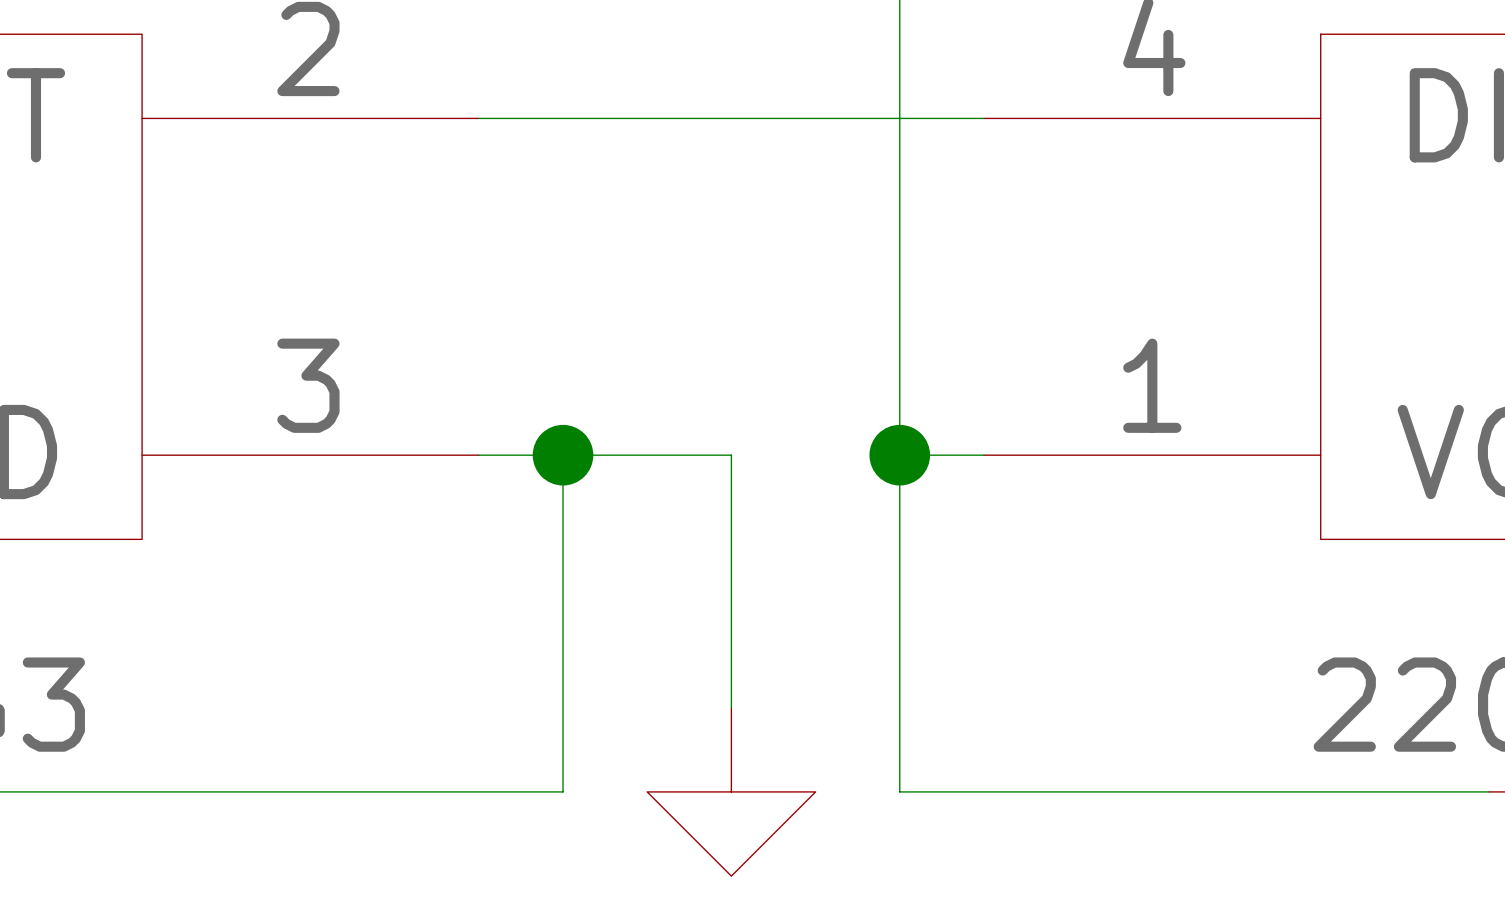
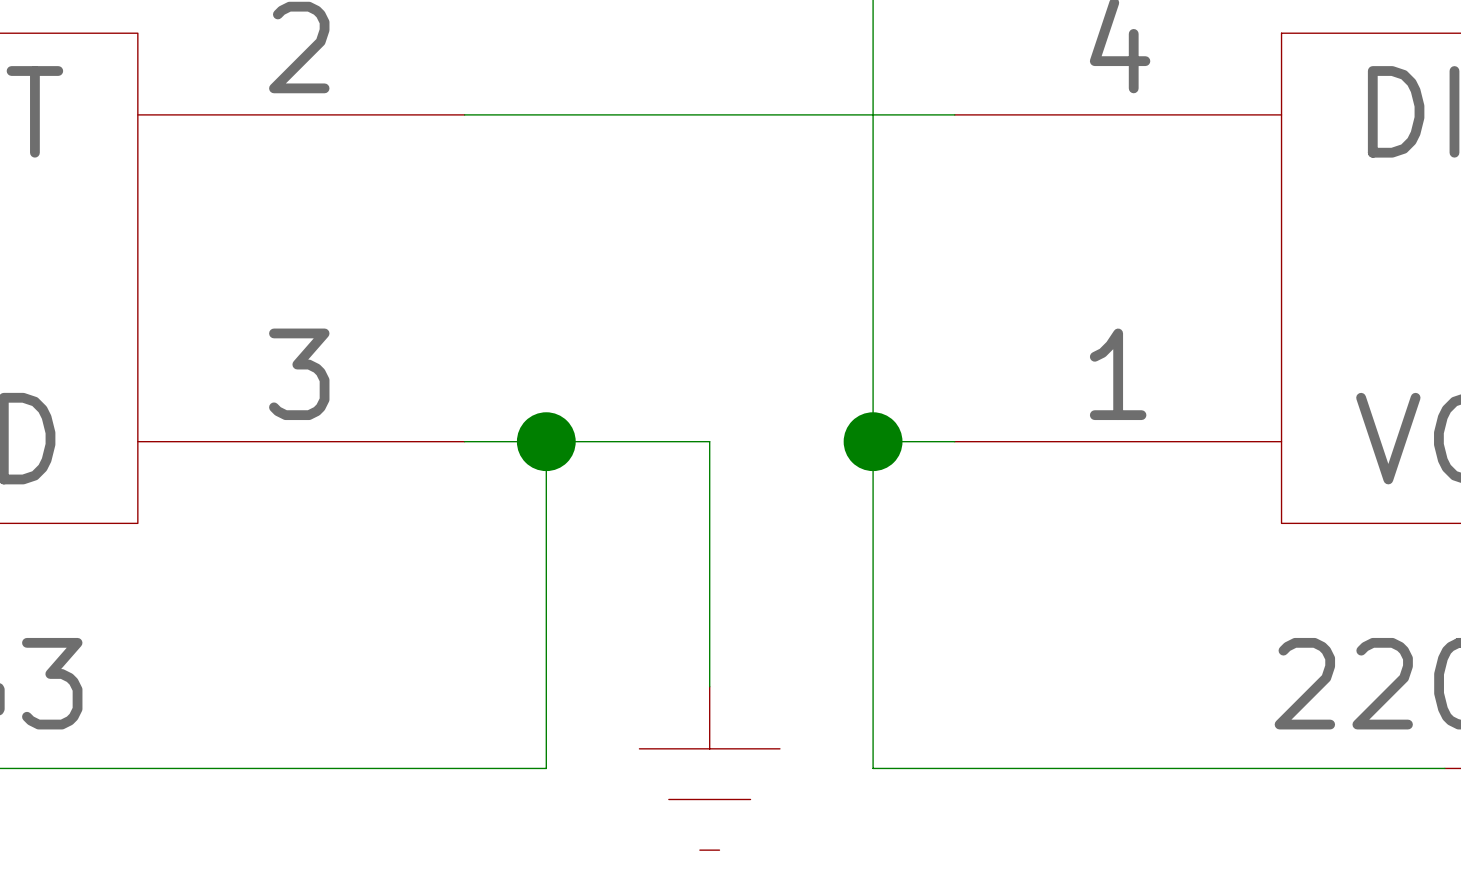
power symbol shape: [647, 707, 816, 877] -> [639, 686, 780, 851]

